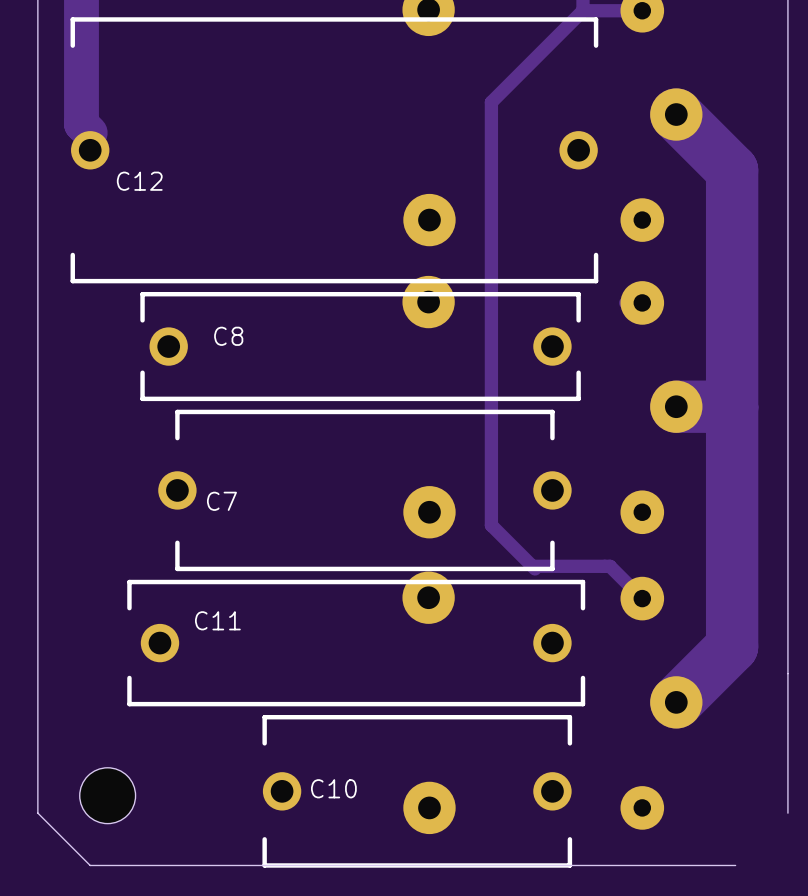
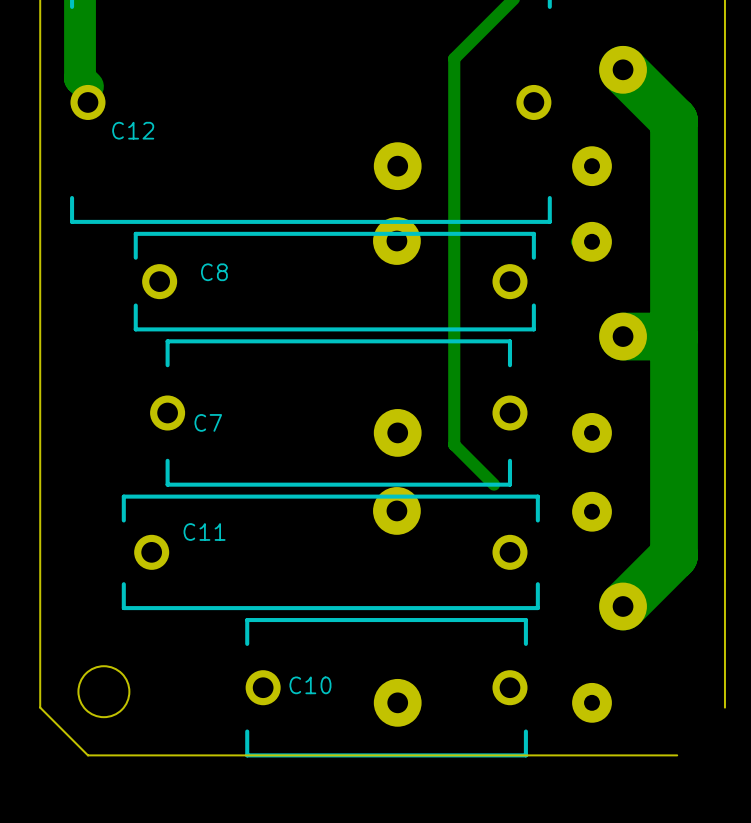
track: (535, 566) (610, 566) (642, 598) -> none

